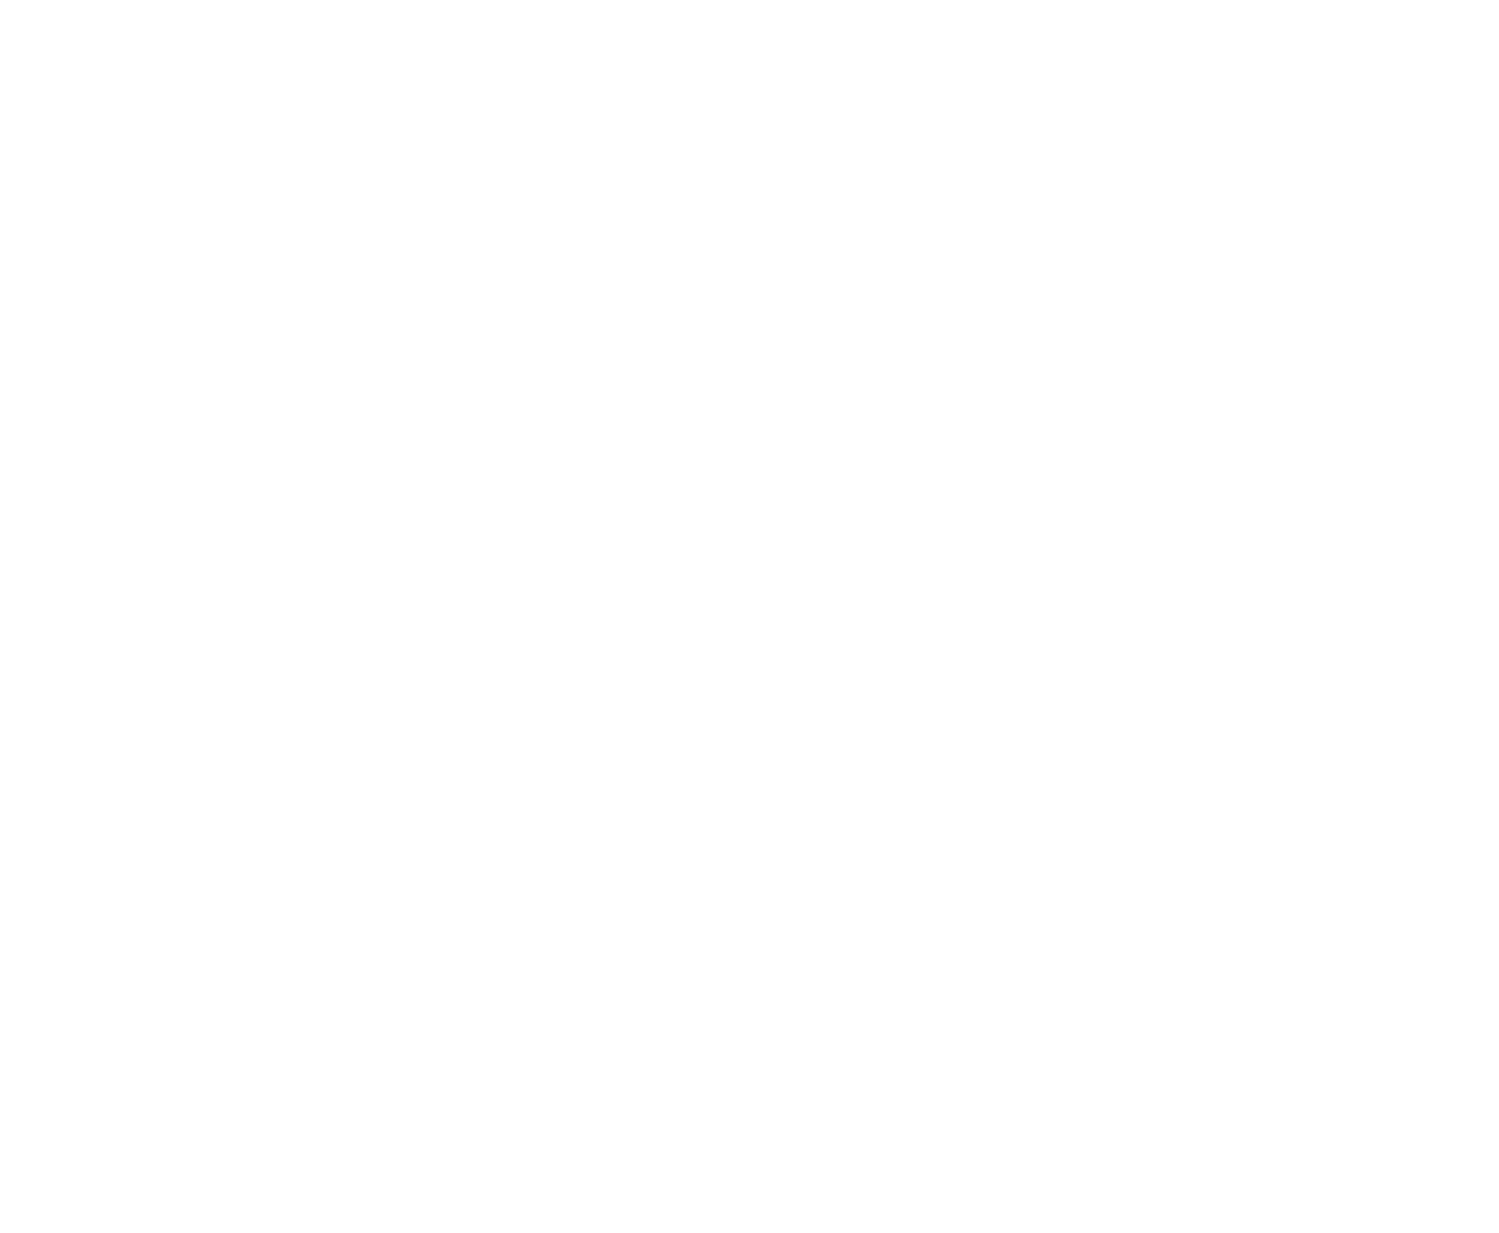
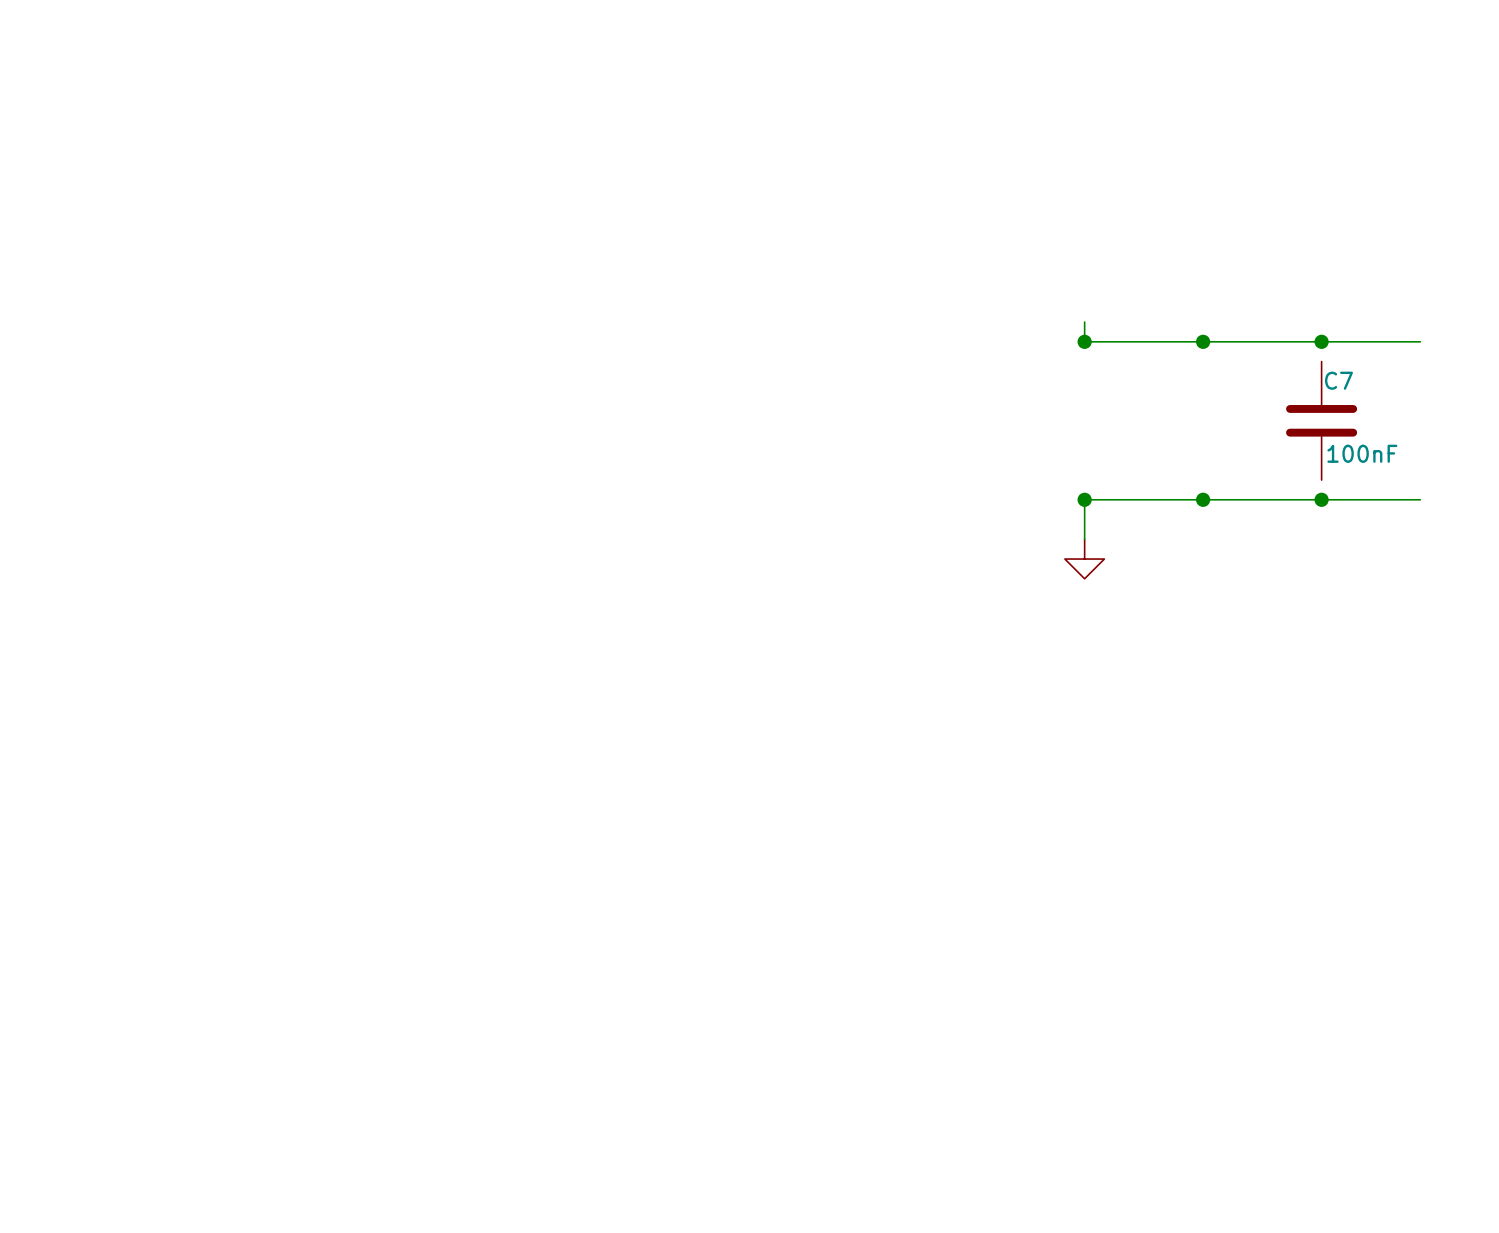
wire: none -> (1084, 322) (1084, 341) (1420, 341)
junction: none -> (1084, 341)
junction: none -> (1203, 341)
junction: none -> (1321, 341)
C7: none -> 100nF (1321, 420)
junction: none -> (1084, 499)
junction: none -> (1203, 499)
junction: none -> (1321, 499)
wire: none -> (1420, 499) (1084, 499) (1084, 539)
power symbol: none -> (1084, 559)

